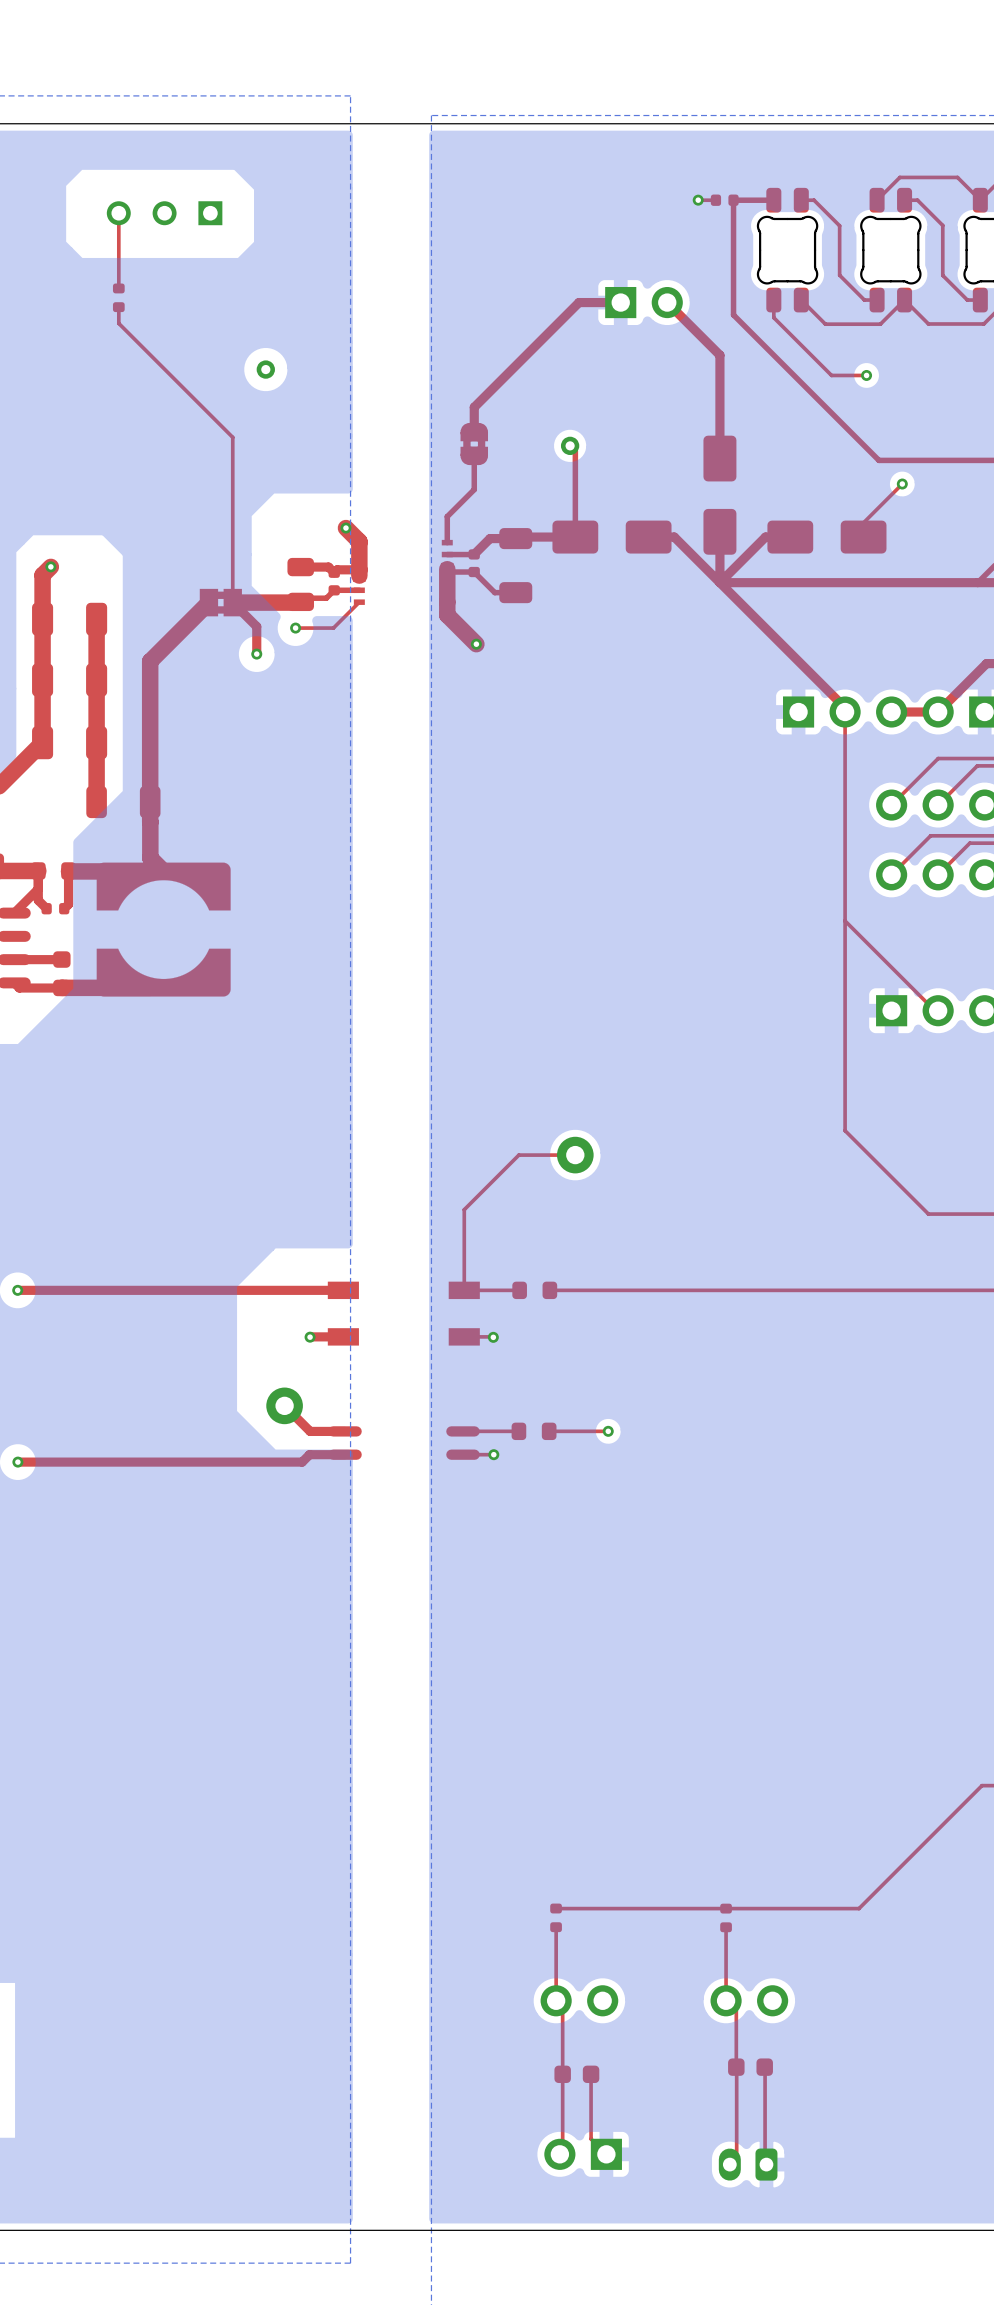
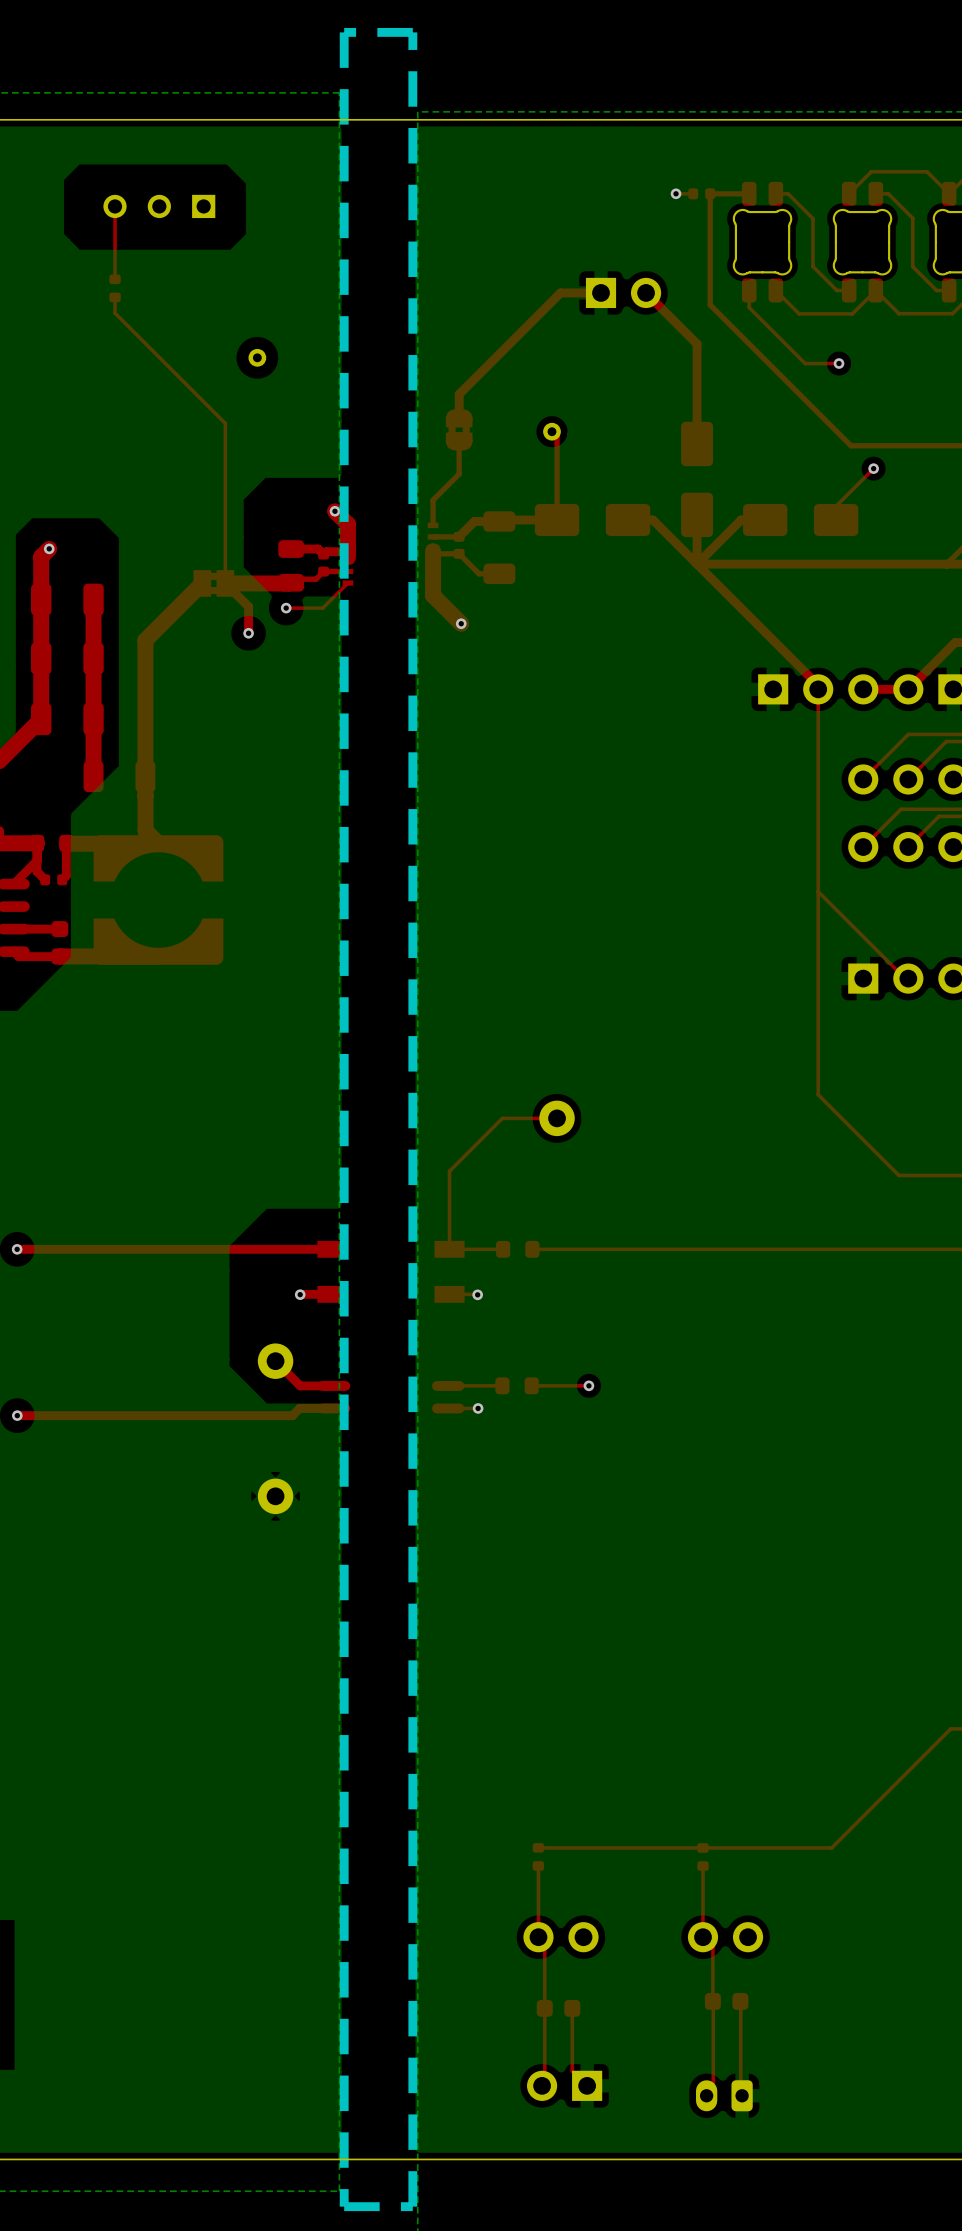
line: none -> (412, 32) (344, 32) (344, 2206) (412, 2206) (412, 32)
part: none -> (275, 1496)

